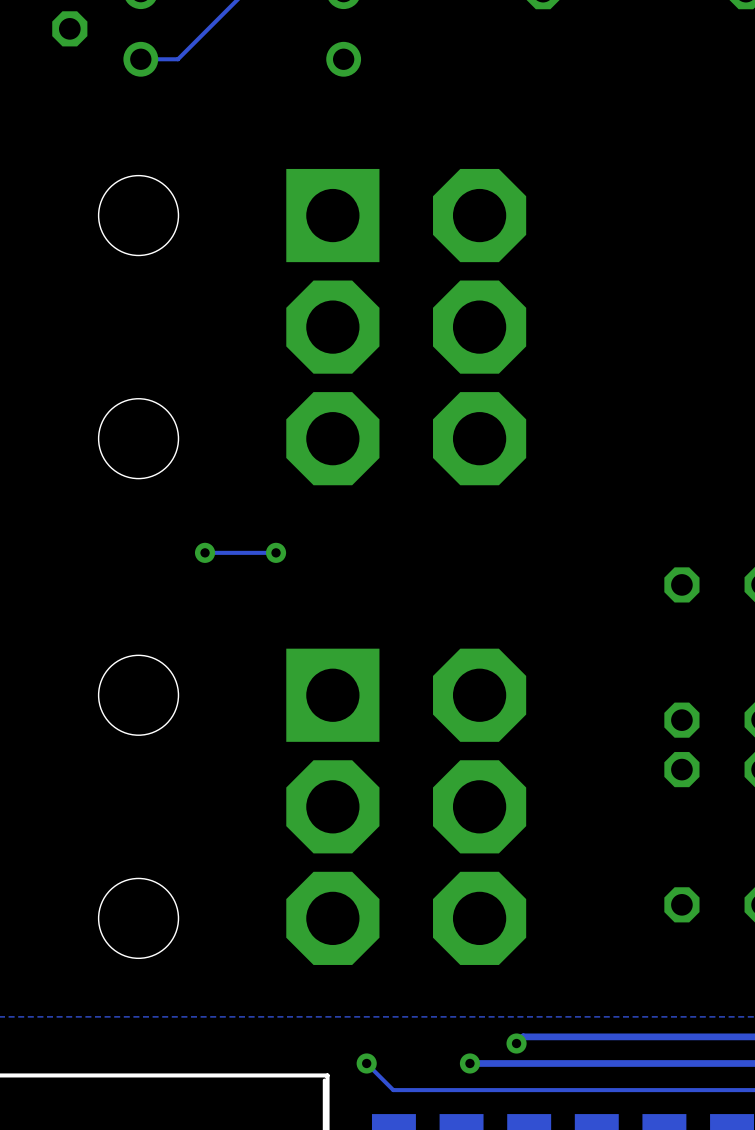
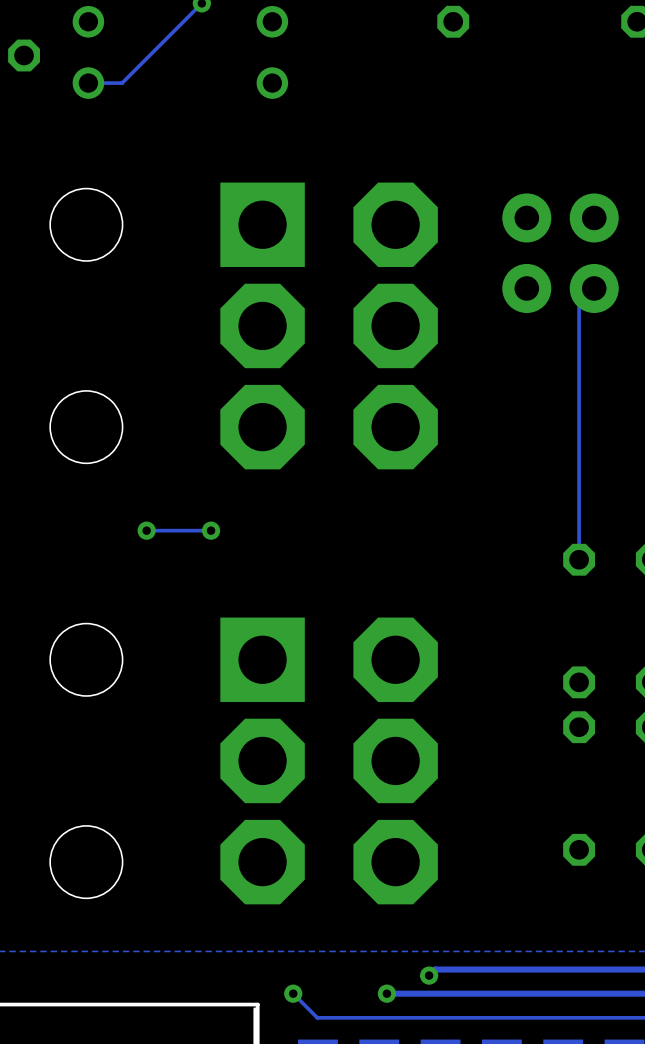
part: none -> (560, 217)
part: none -> (560, 288)
track: none -> (594, 288) (579, 303) (579, 559)

